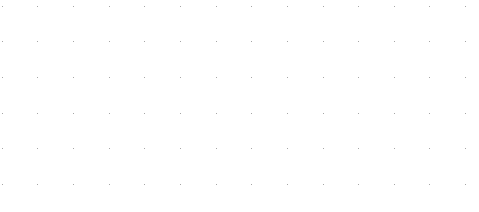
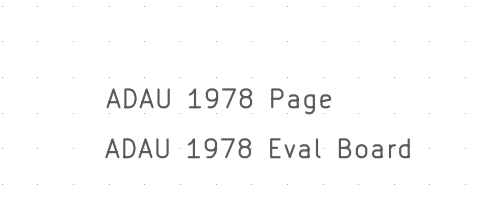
text: none -> ADAU 1978 Page (218, 101)
text: none -> ADAU 1978 Eval Board (257, 148)

